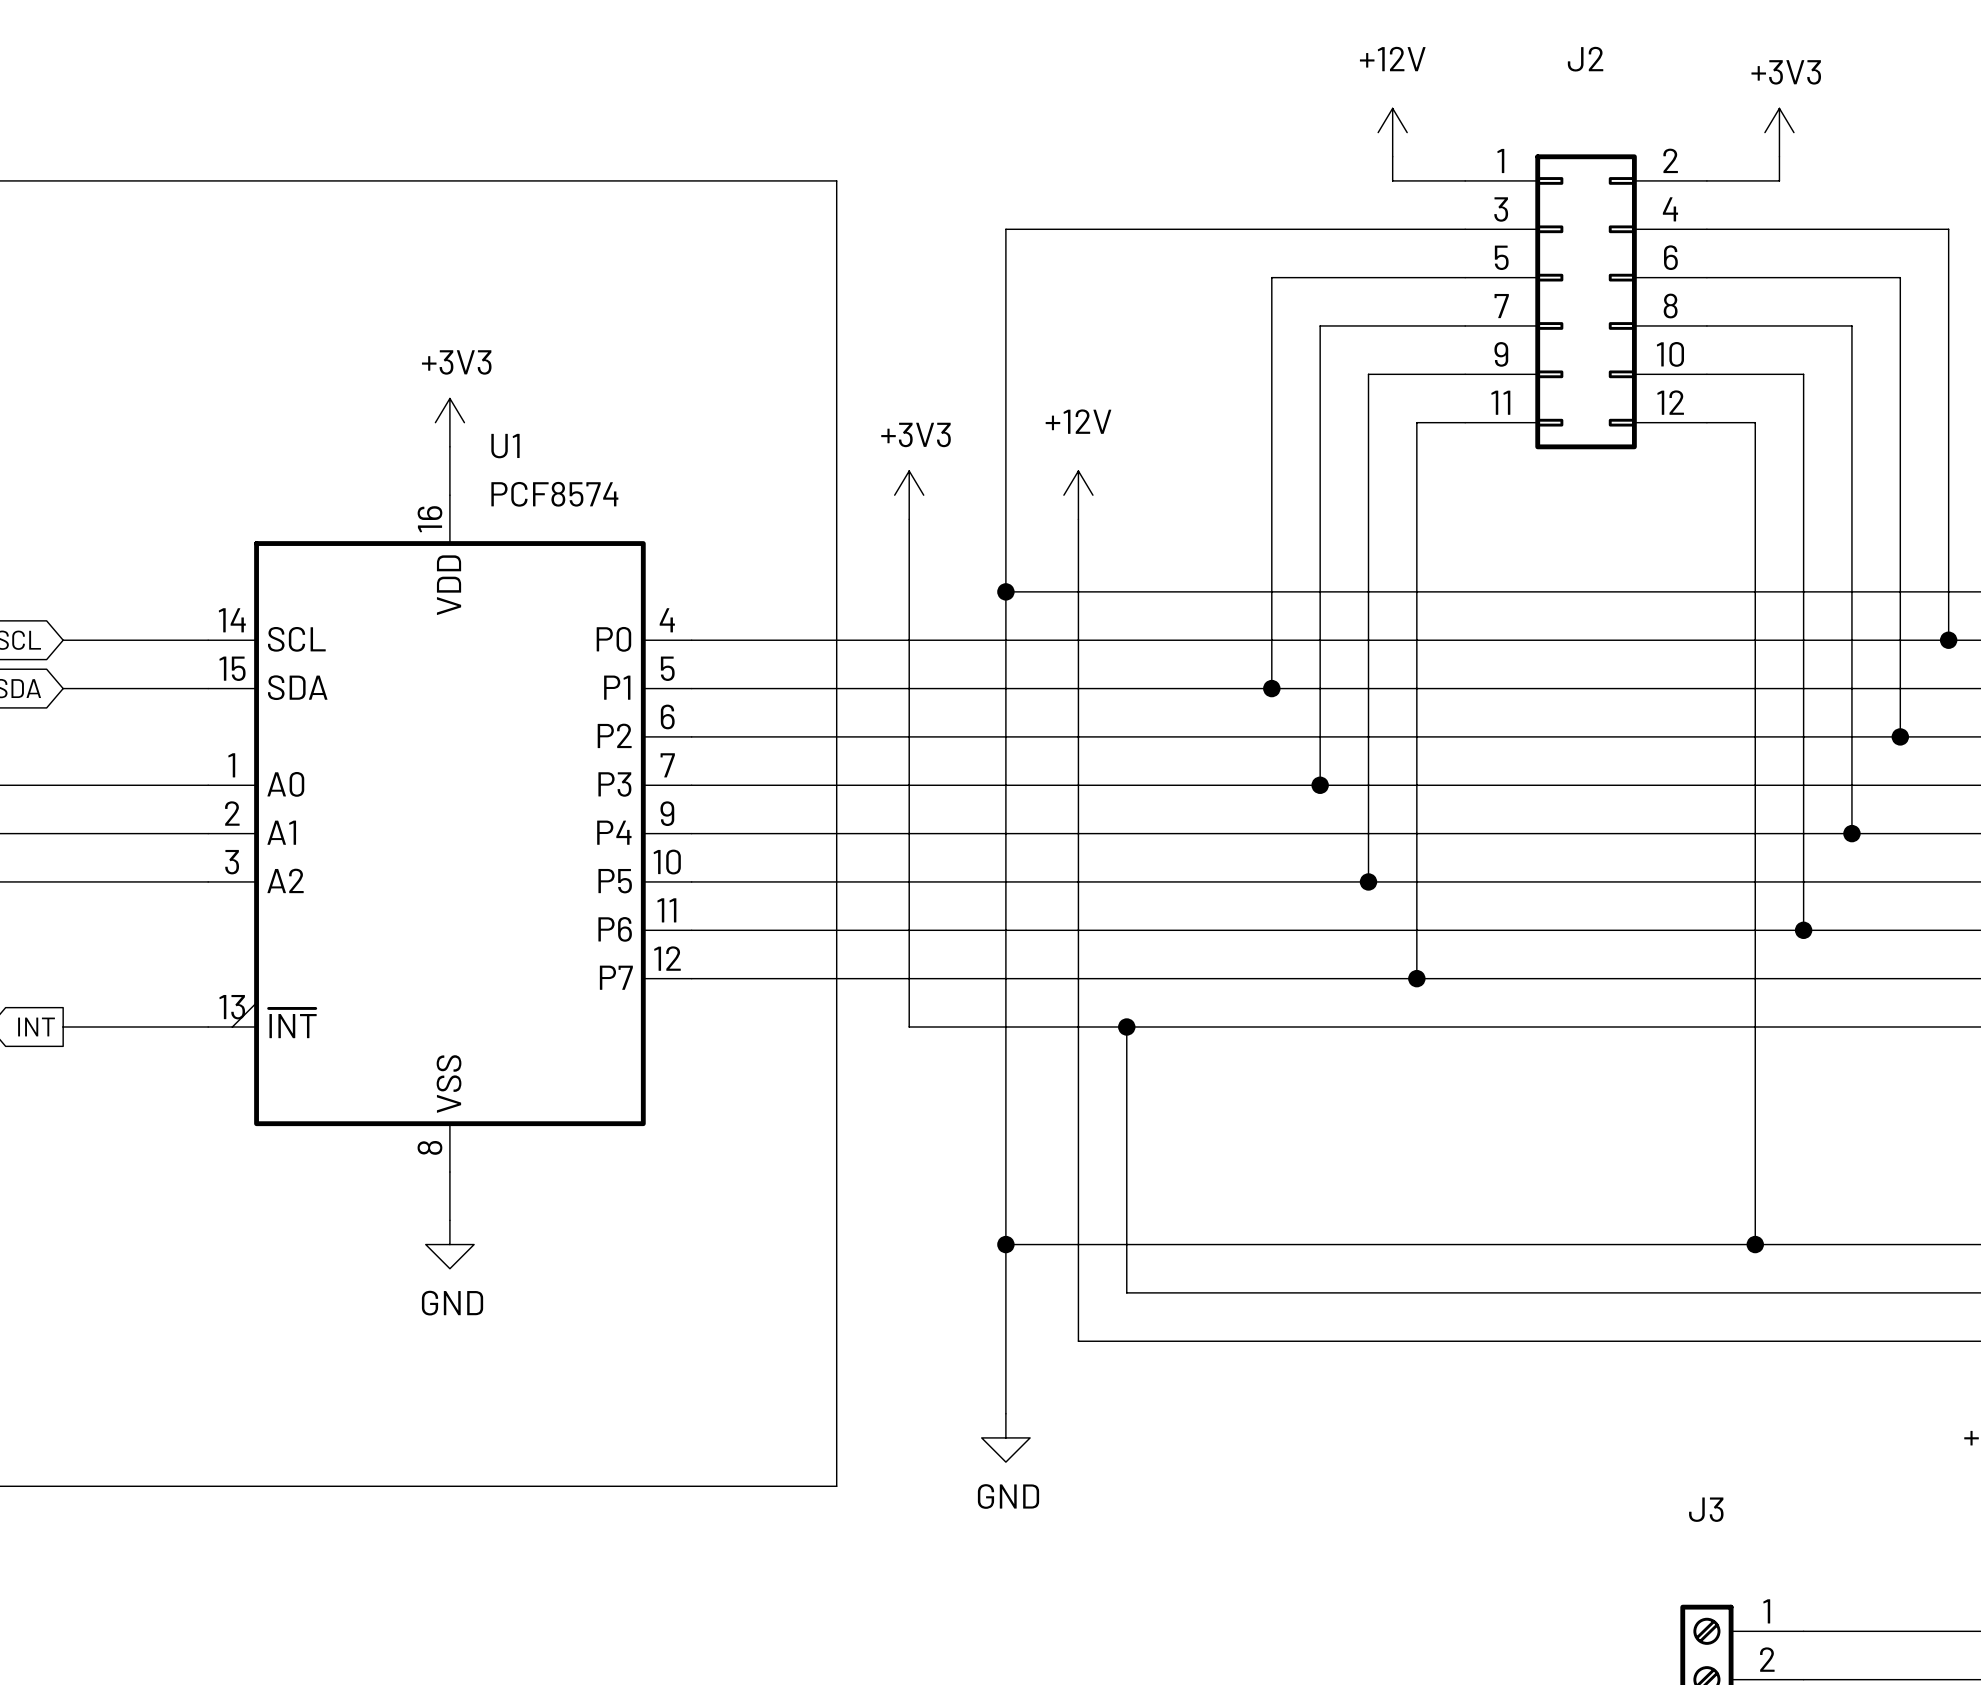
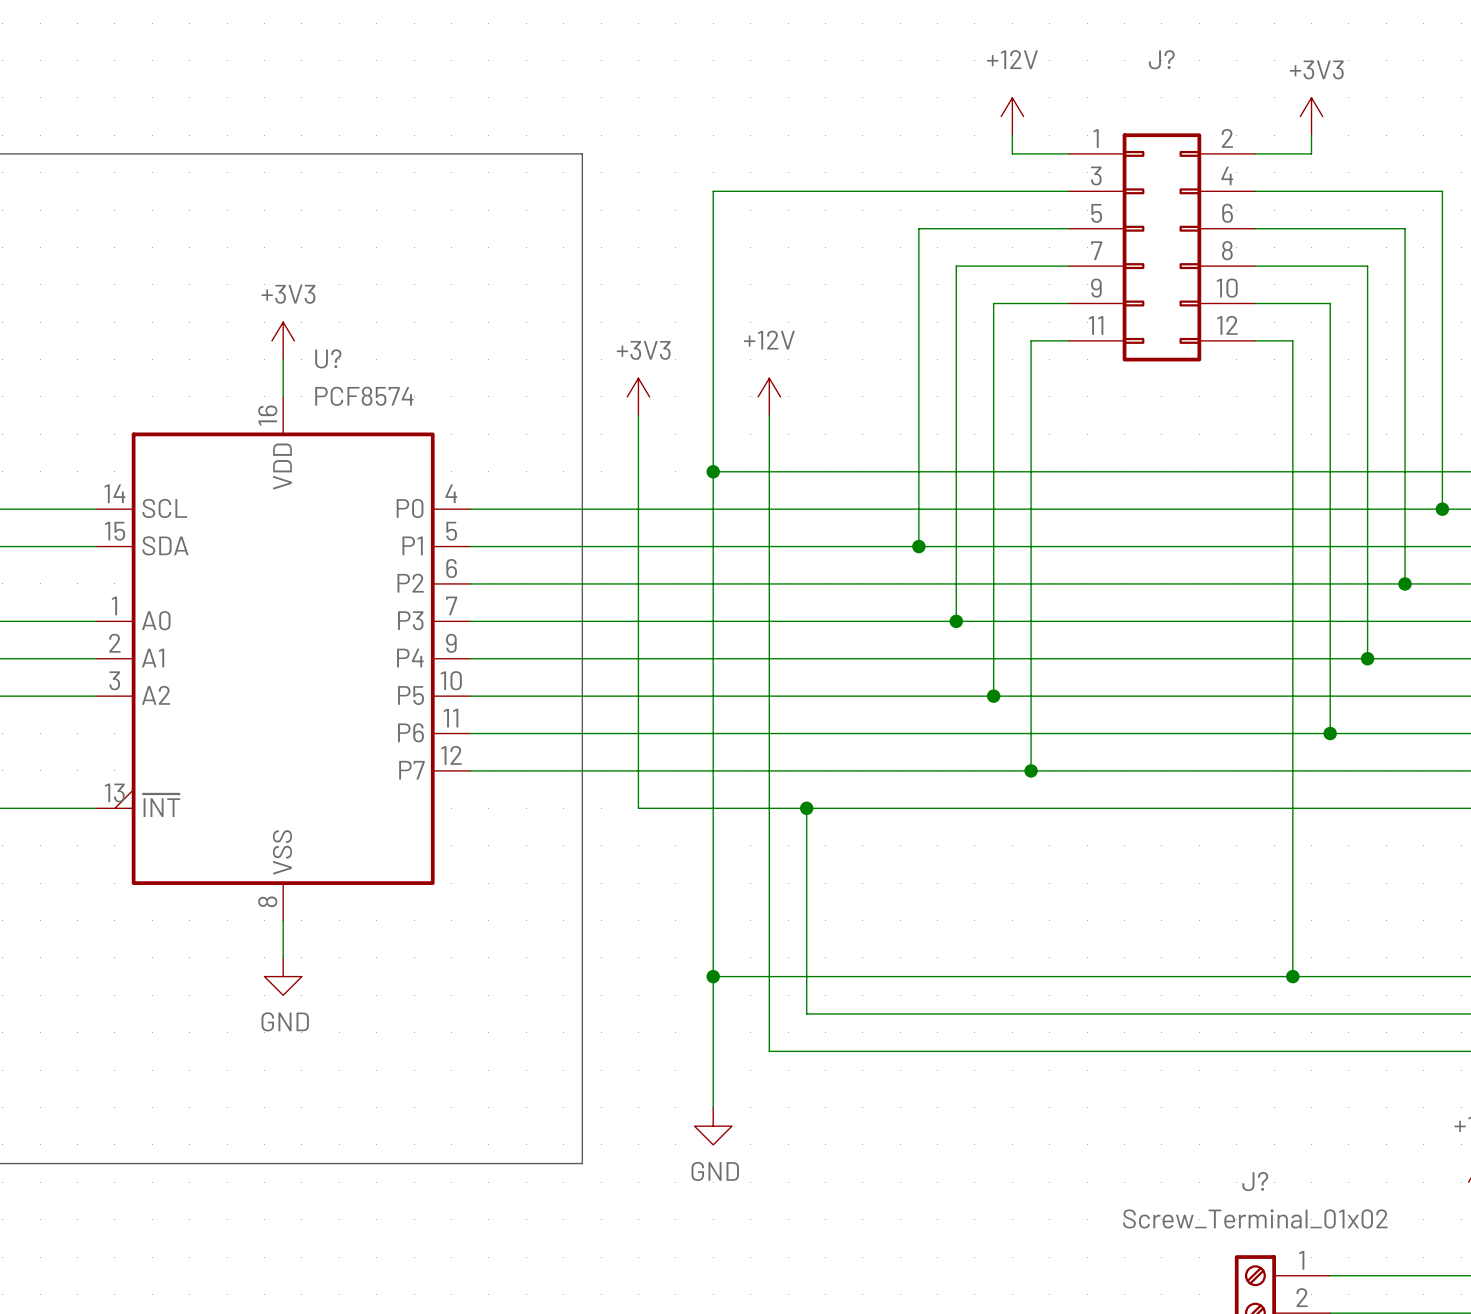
J2 name: J2 (1585, 59) -> J? (1161, 59)
U1 name: U1 (505, 446) -> U? (328, 358)
J3 name: J3 (1706, 1509) -> J? (1255, 1181)
J3 value: none -> Screw_Terminal_01x02 (1255, 1218)

